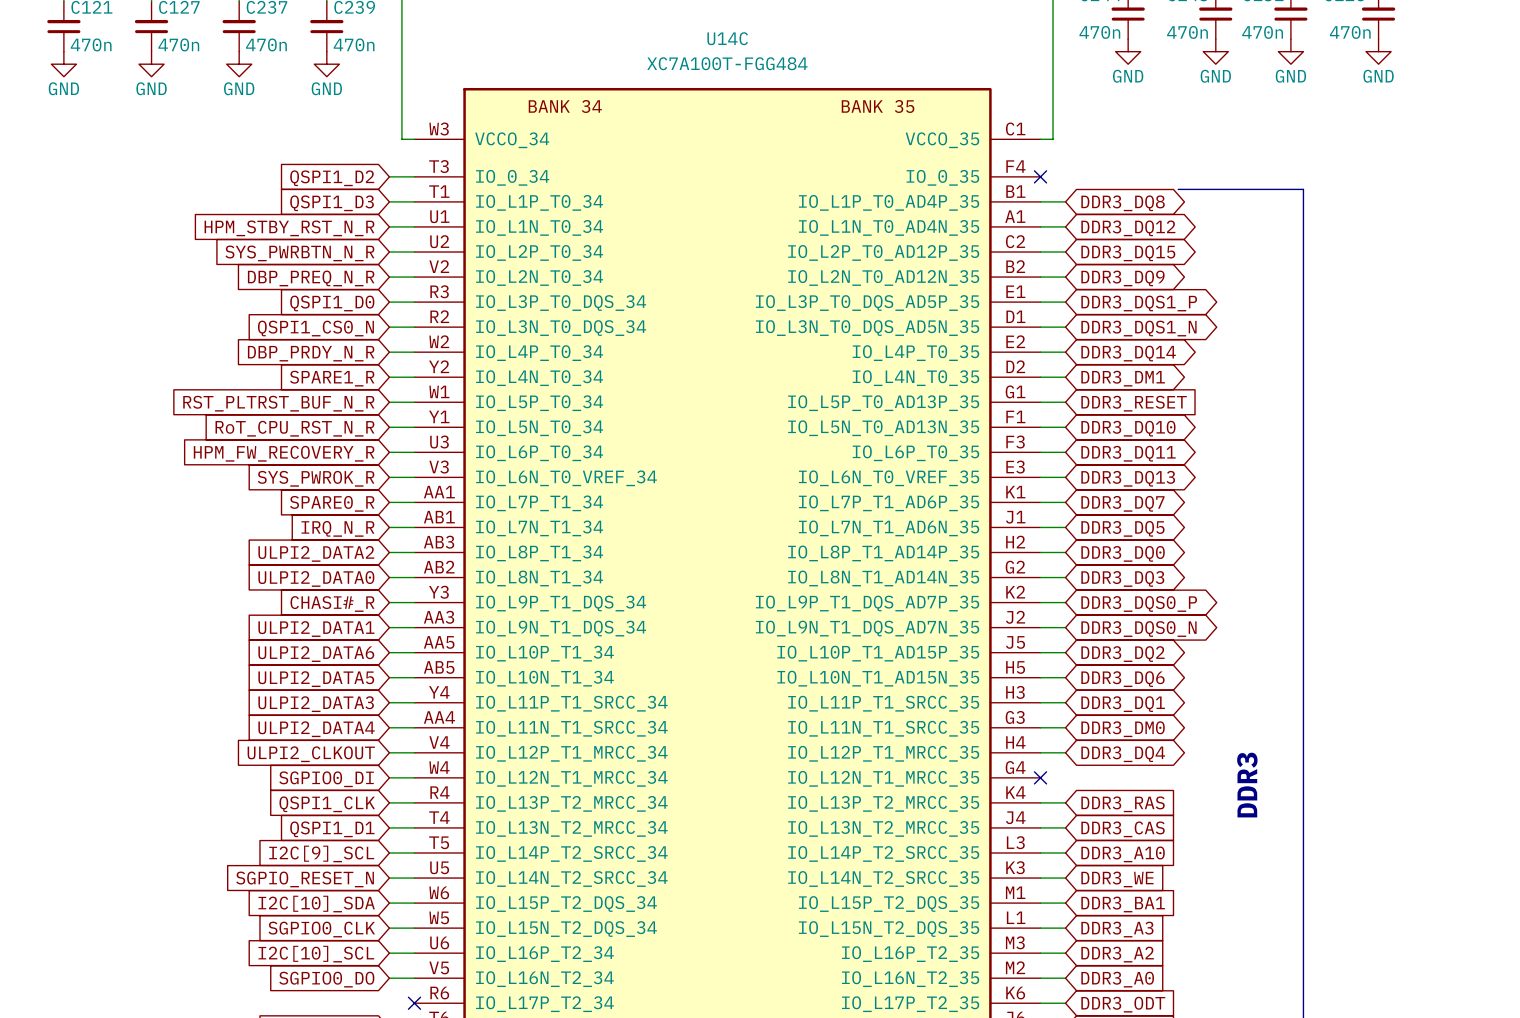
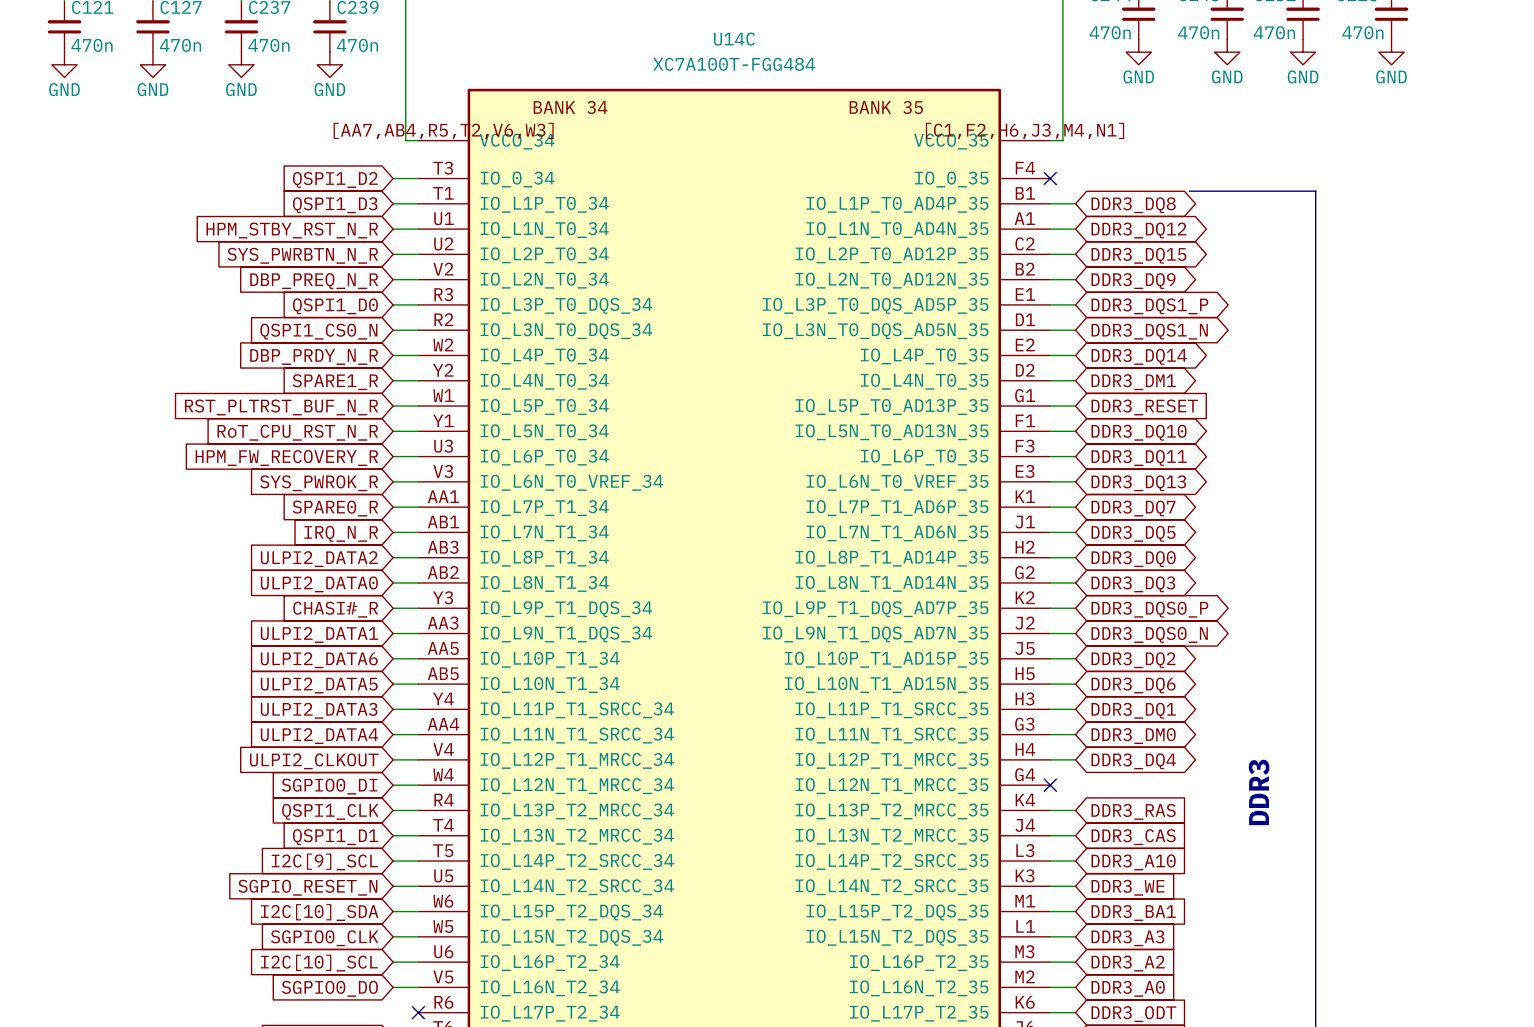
U14C pin number: W3 (439, 128) -> [AA7,AB4,R5,T2,V6,W3] (443, 130)
U14C pin number: C1 (1015, 128) -> [C1,F2,H6,J3,M4,N1] (1025, 130)

